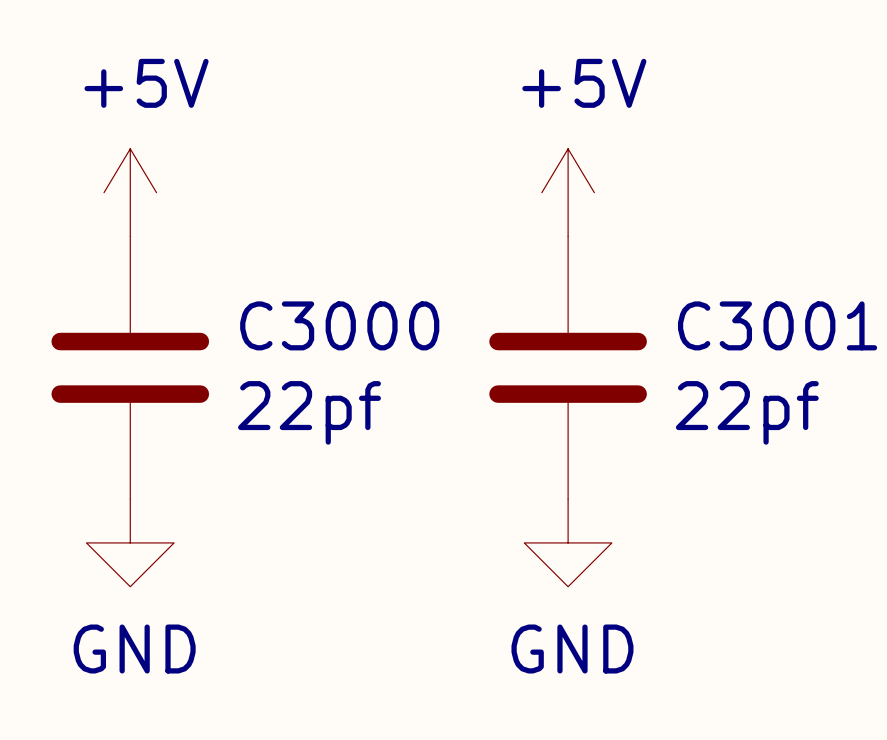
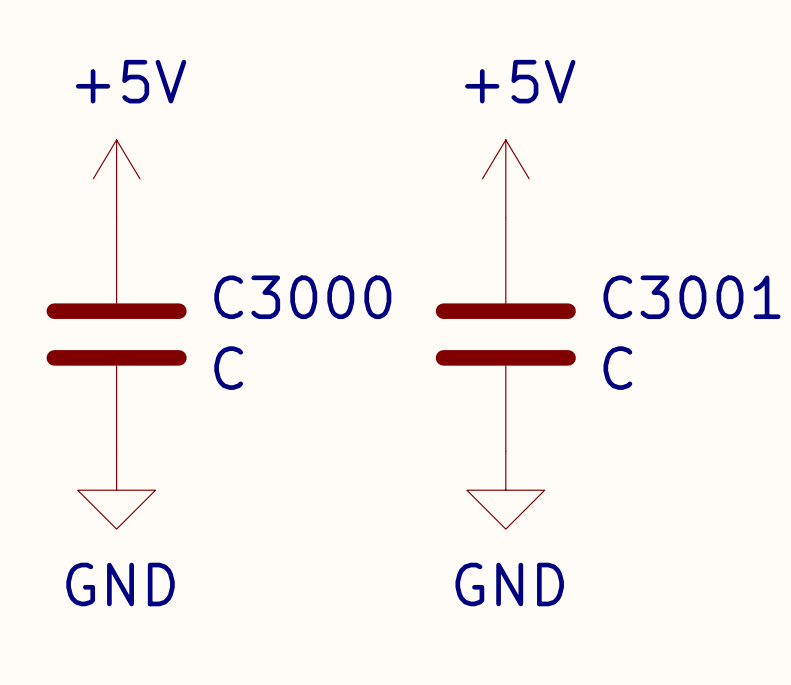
C3000 value: 22pf (309, 412) -> C (228, 368)
C3001 value: 22pf (747, 412) -> C (617, 368)

